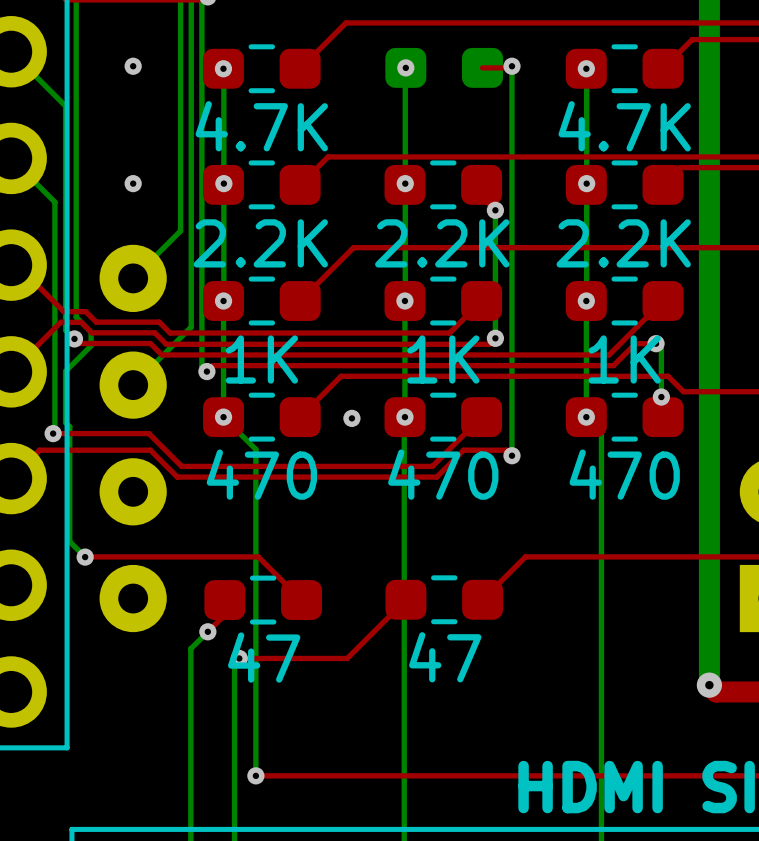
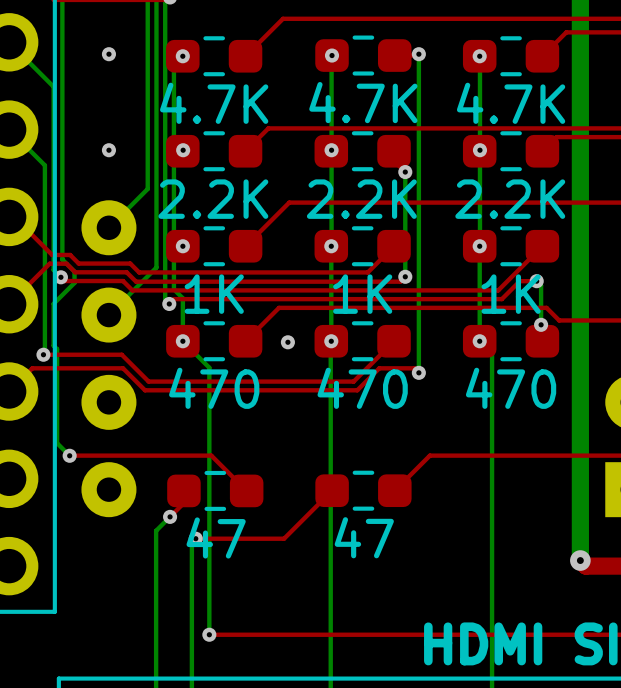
part side: bottom (444, 67) -> top (363, 55)
bottom track: (223, 69) (223, 300) -> (182, 56) (173, 65) (173, 141) (183, 150) (173, 159) (173, 237) (182, 246) (173, 255) (173, 289) (182, 298)
bottom track: (223, 301) (223, 364) -> none

